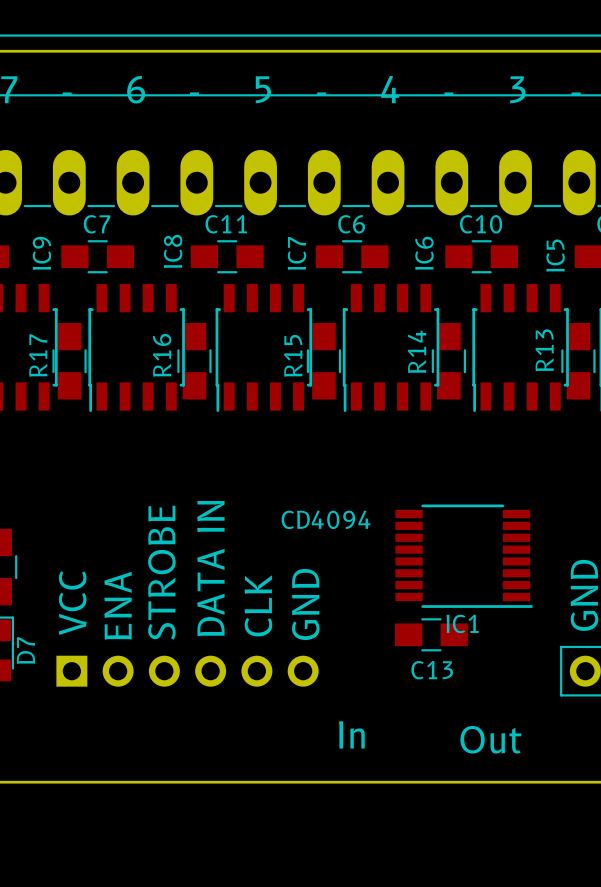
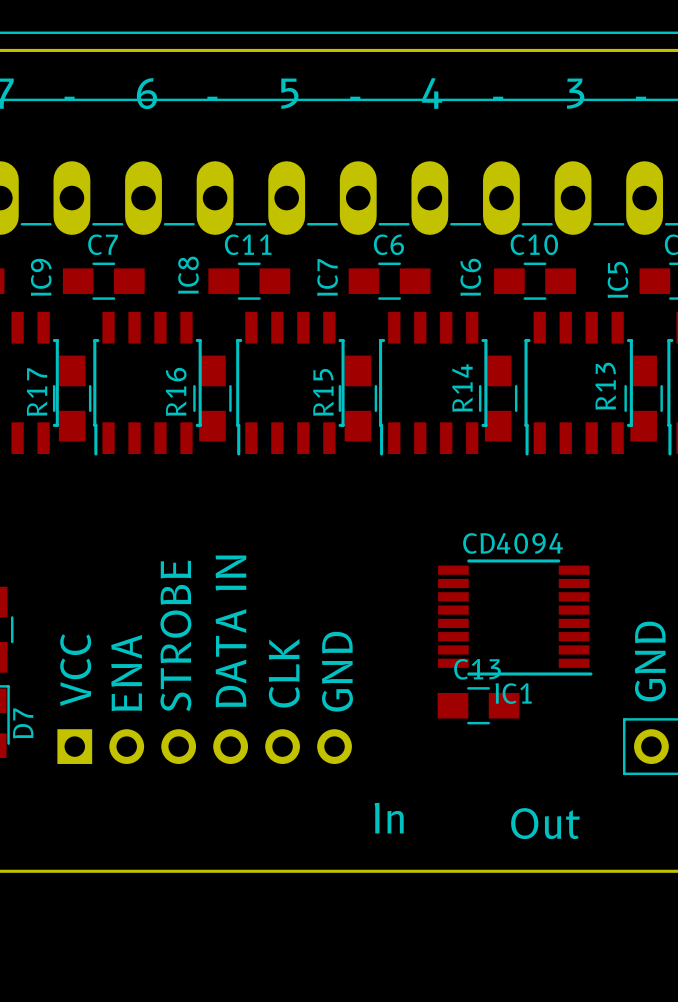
IC1 value position: CD4094 (326, 519) -> CD4094 (513, 543)
C13 name position: C13 (432, 670) -> C13 (477, 669)

